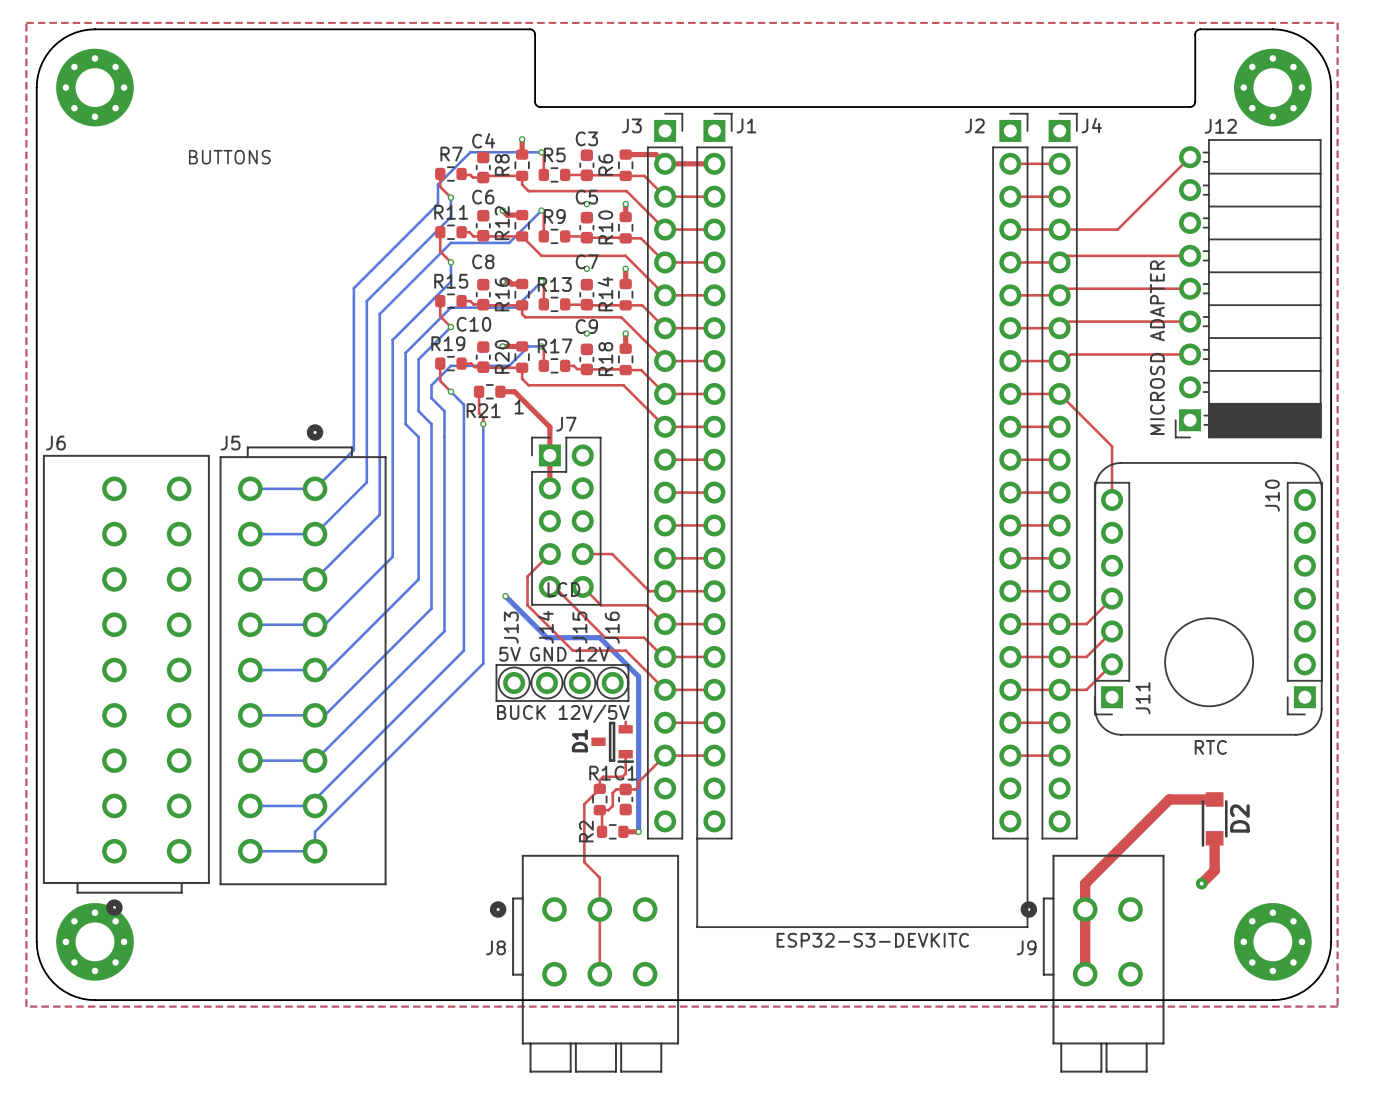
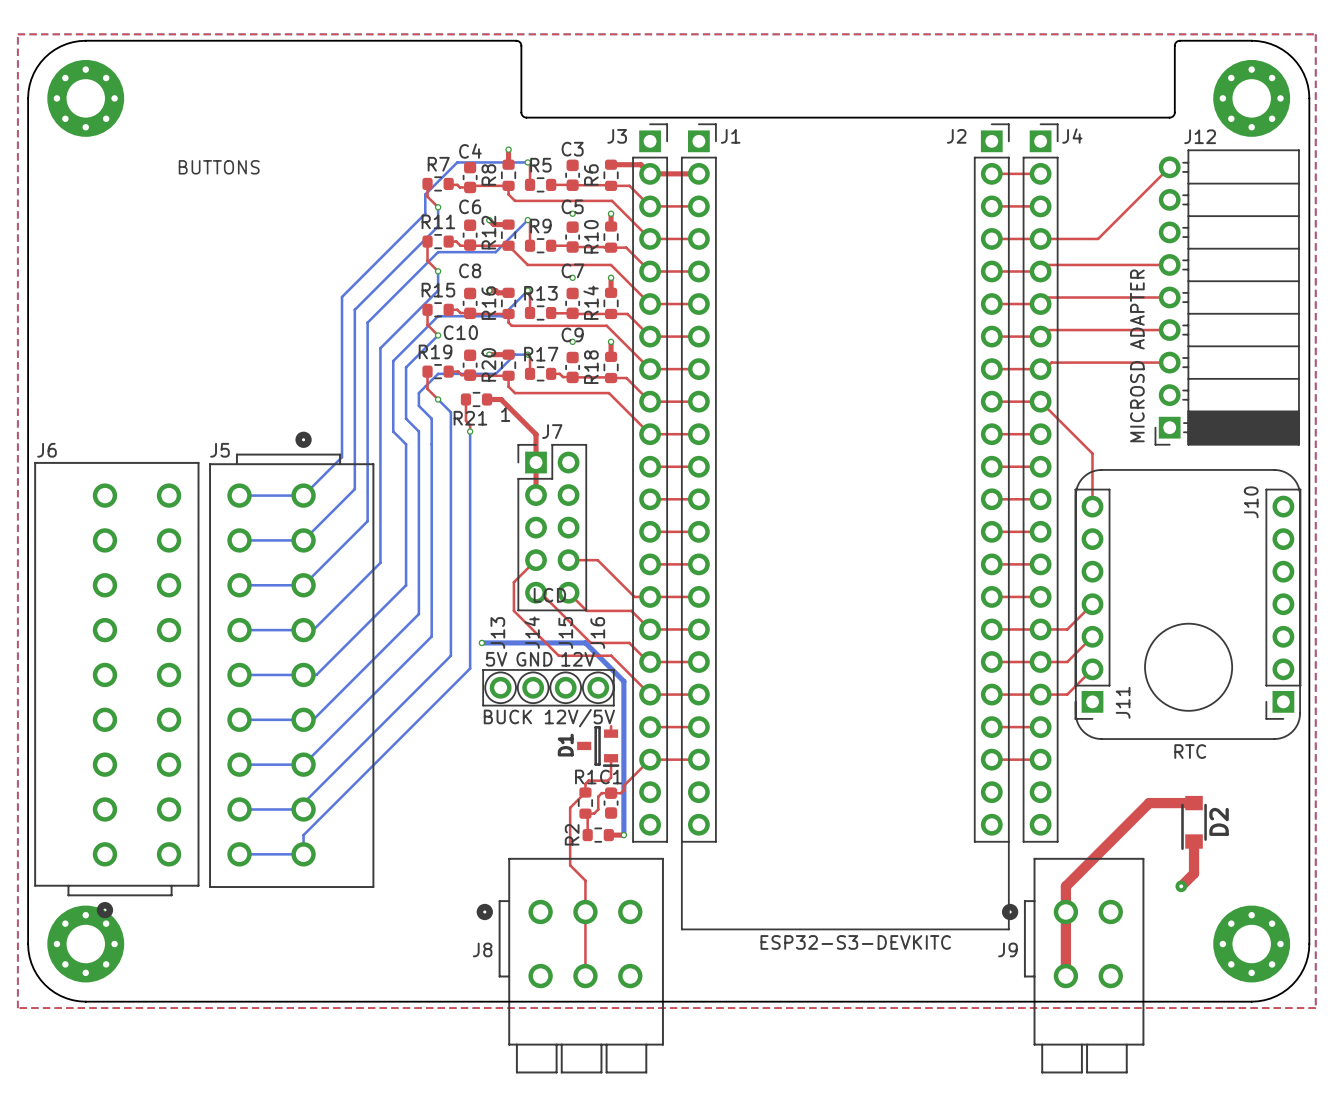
bottom track: (505, 596) (546, 637) -> (481, 642) (533, 642)
via position: (505, 596) -> (481, 642)

